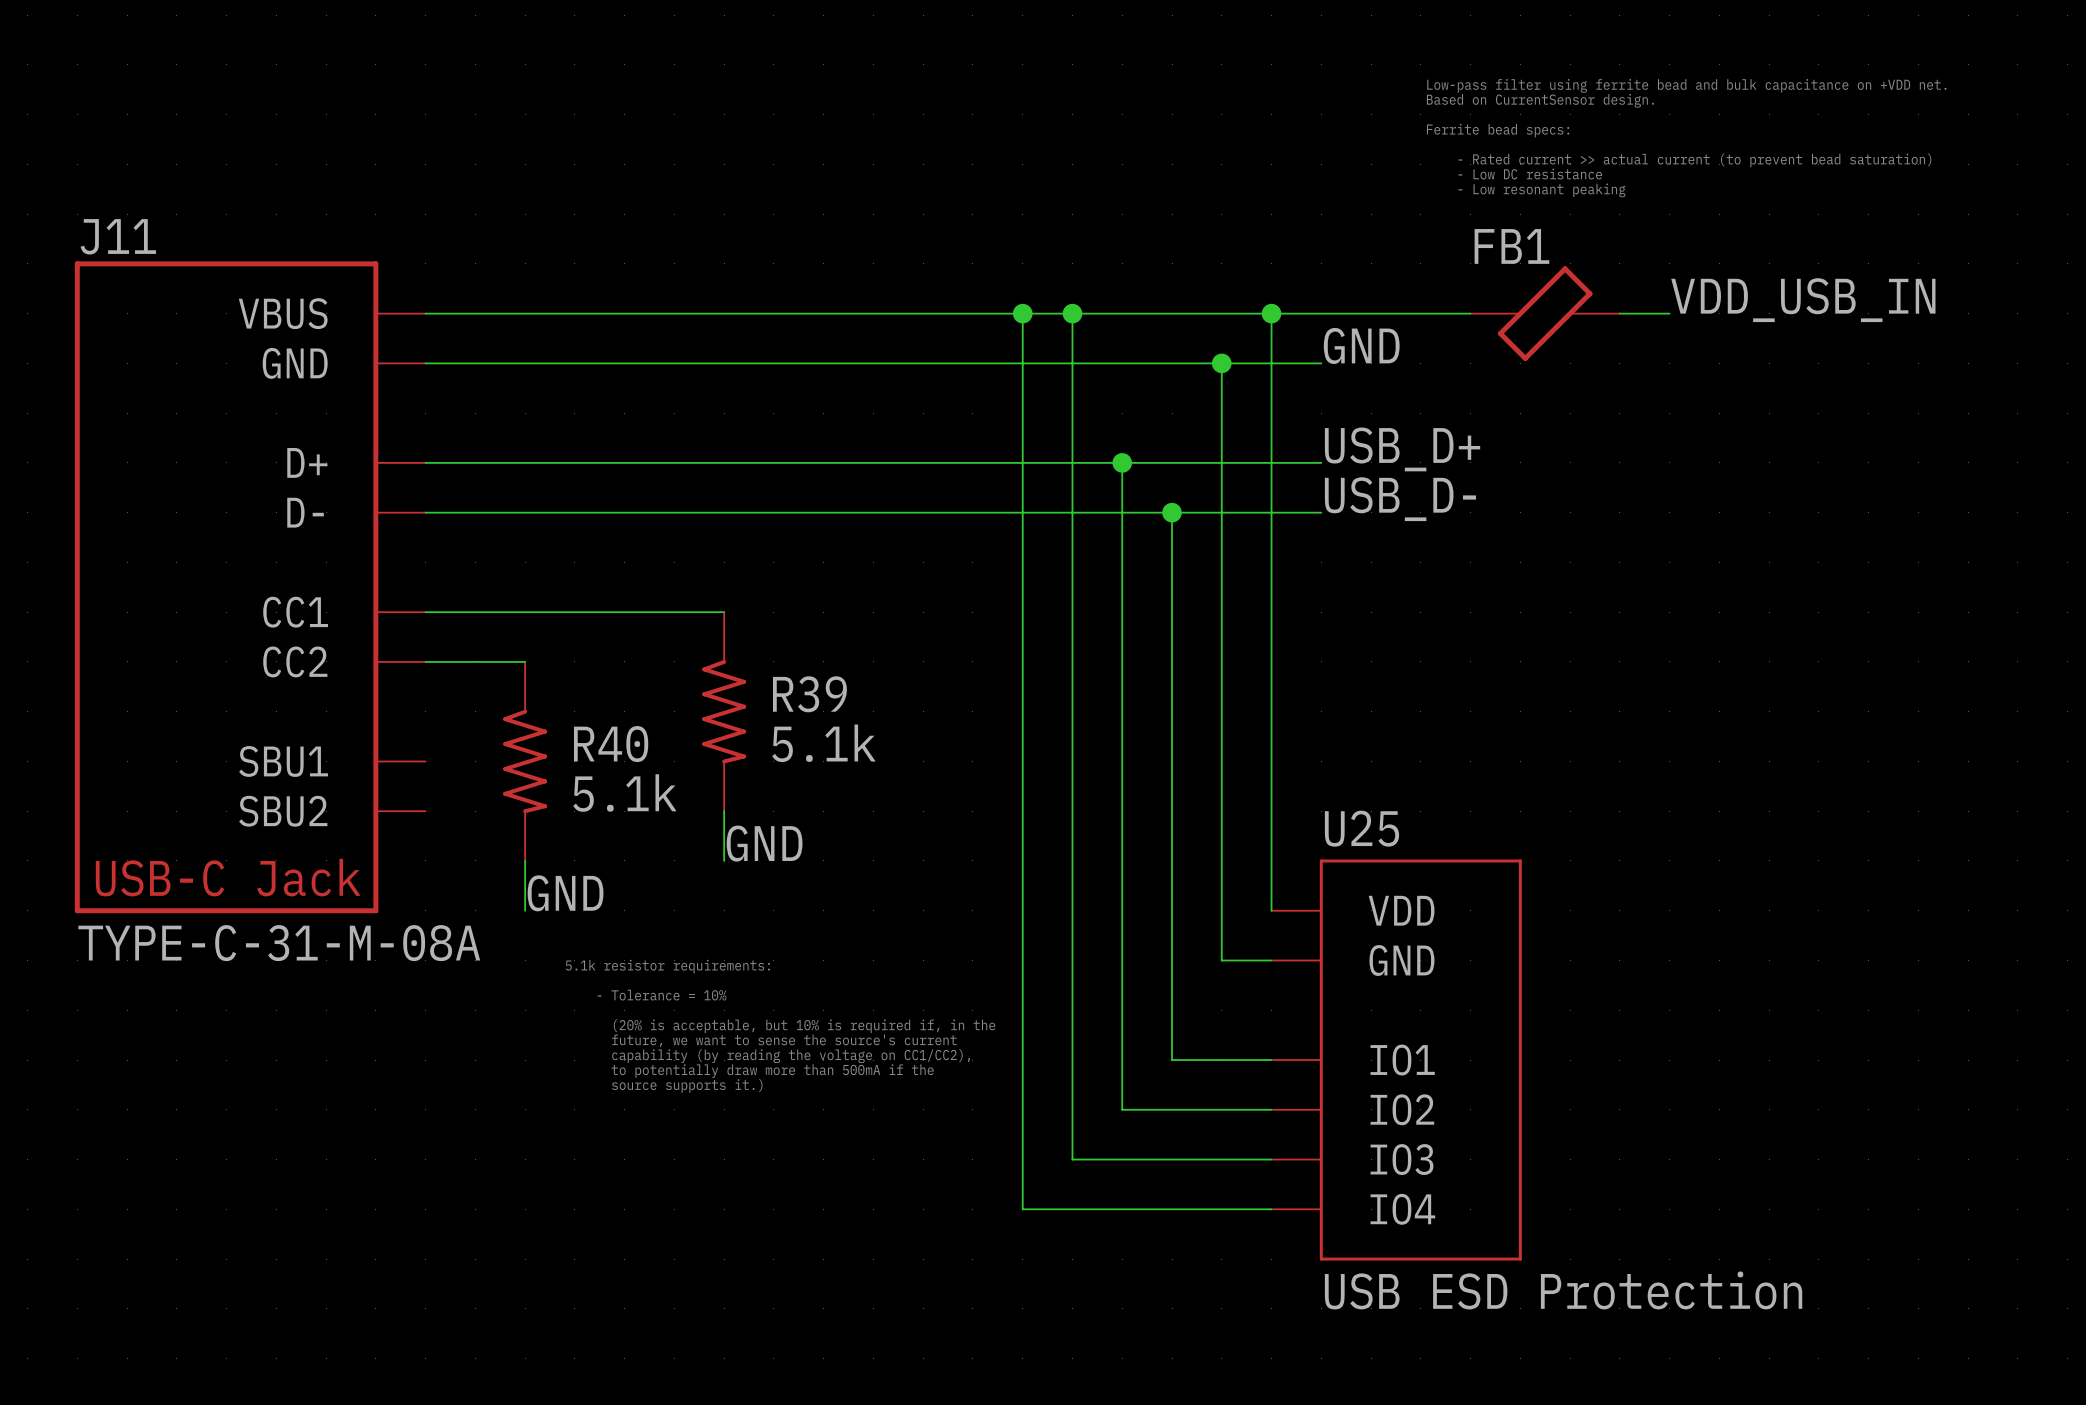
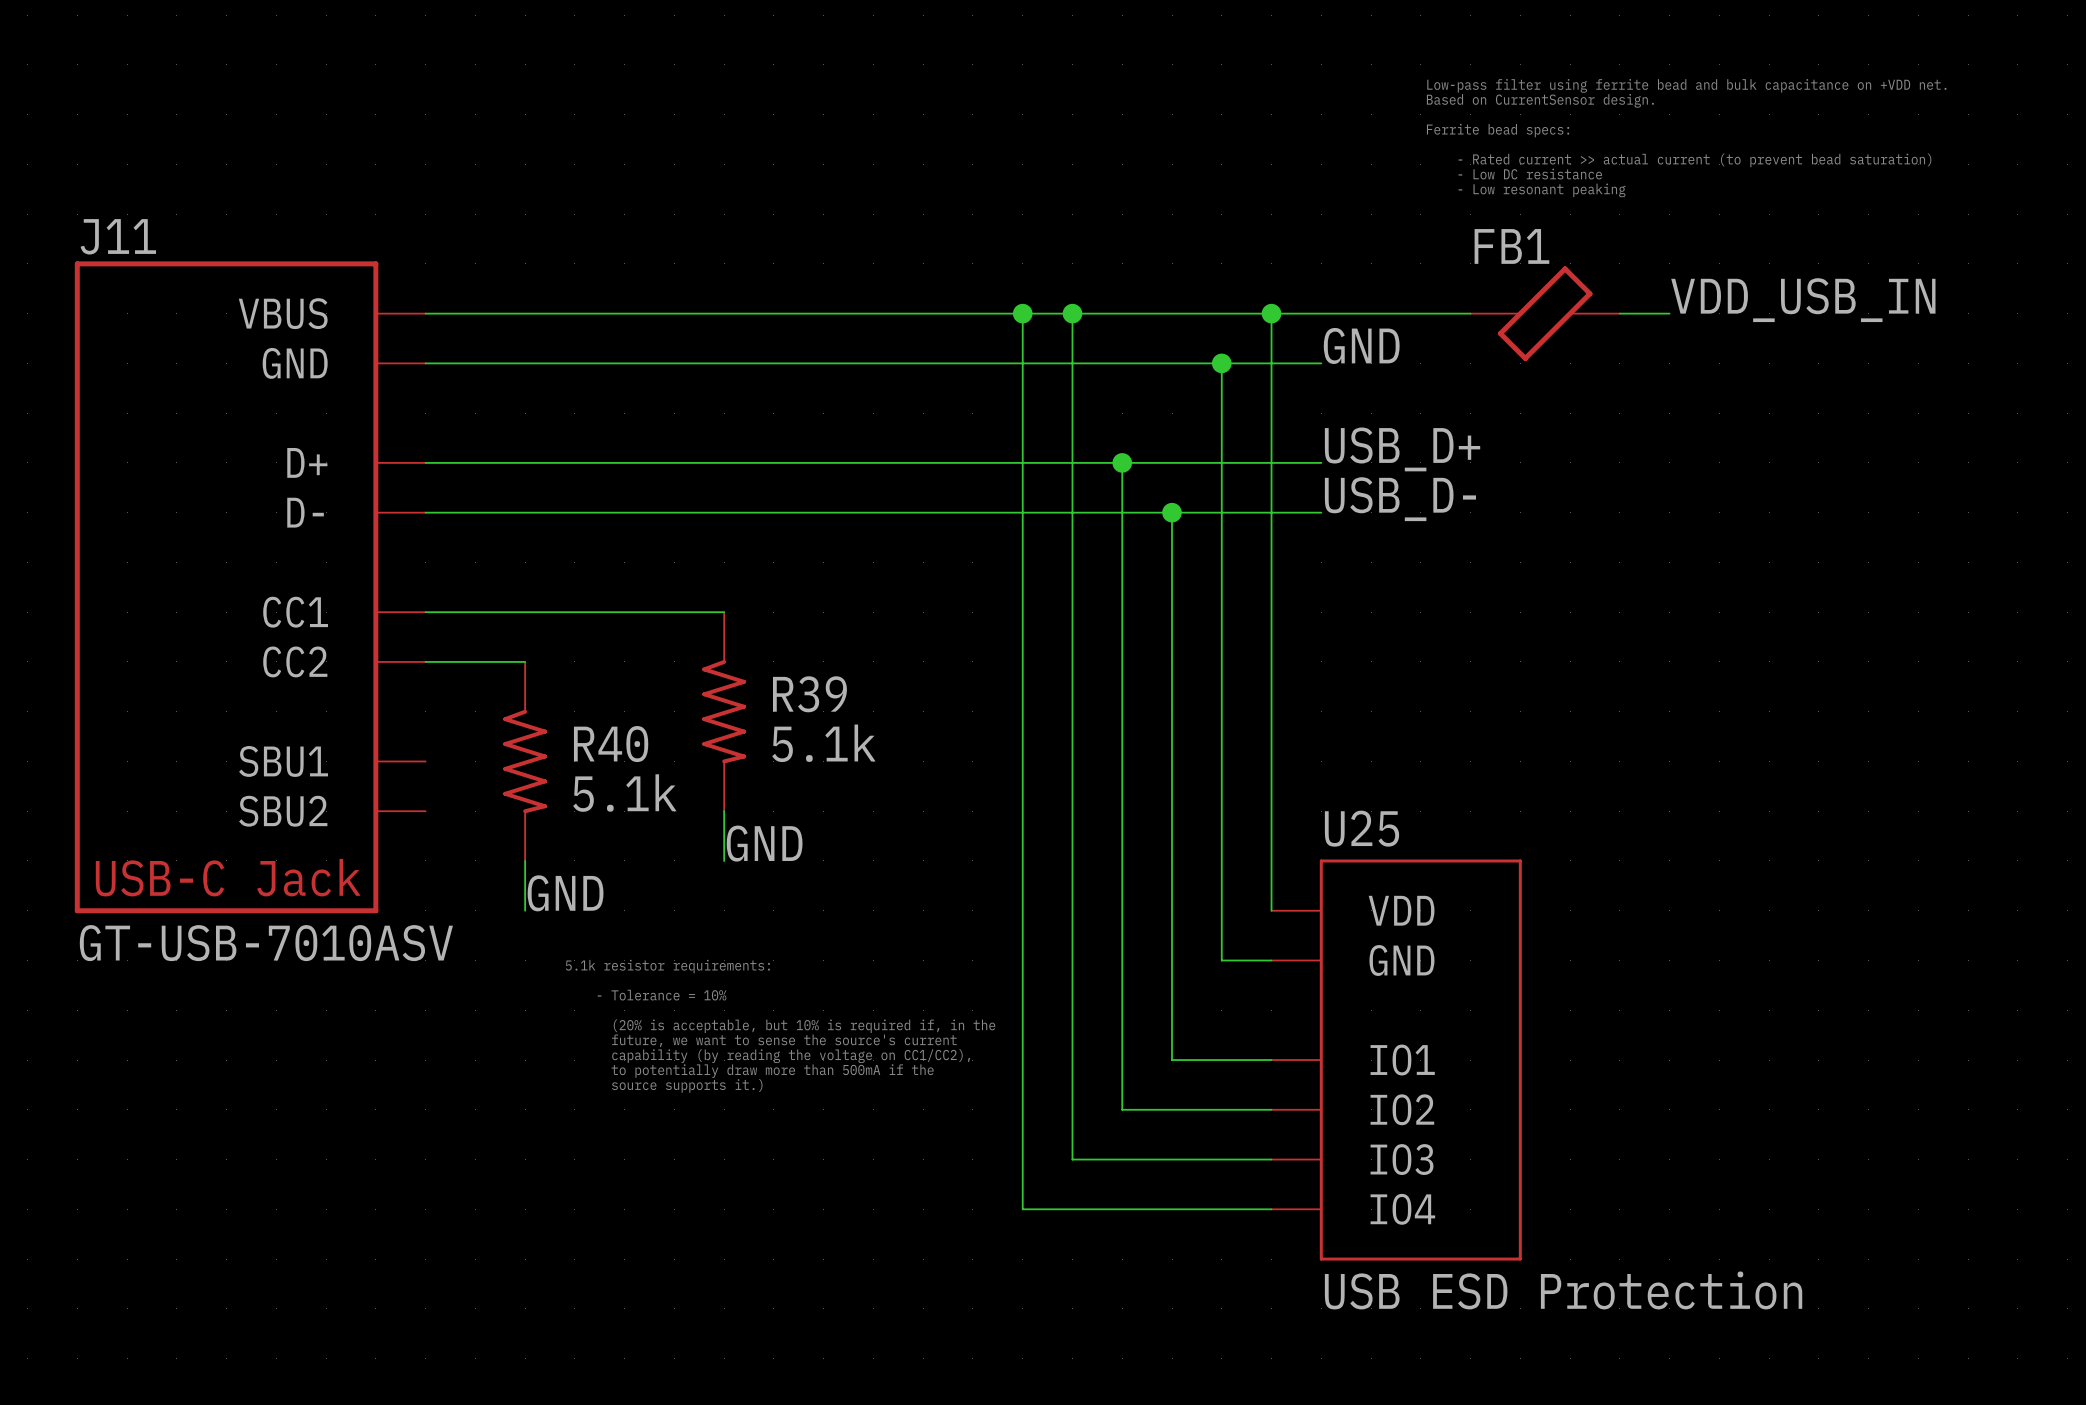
J11 text: TYPE-C-31-M-08A (279, 943) -> GT-USB-7010ASV (266, 943)

